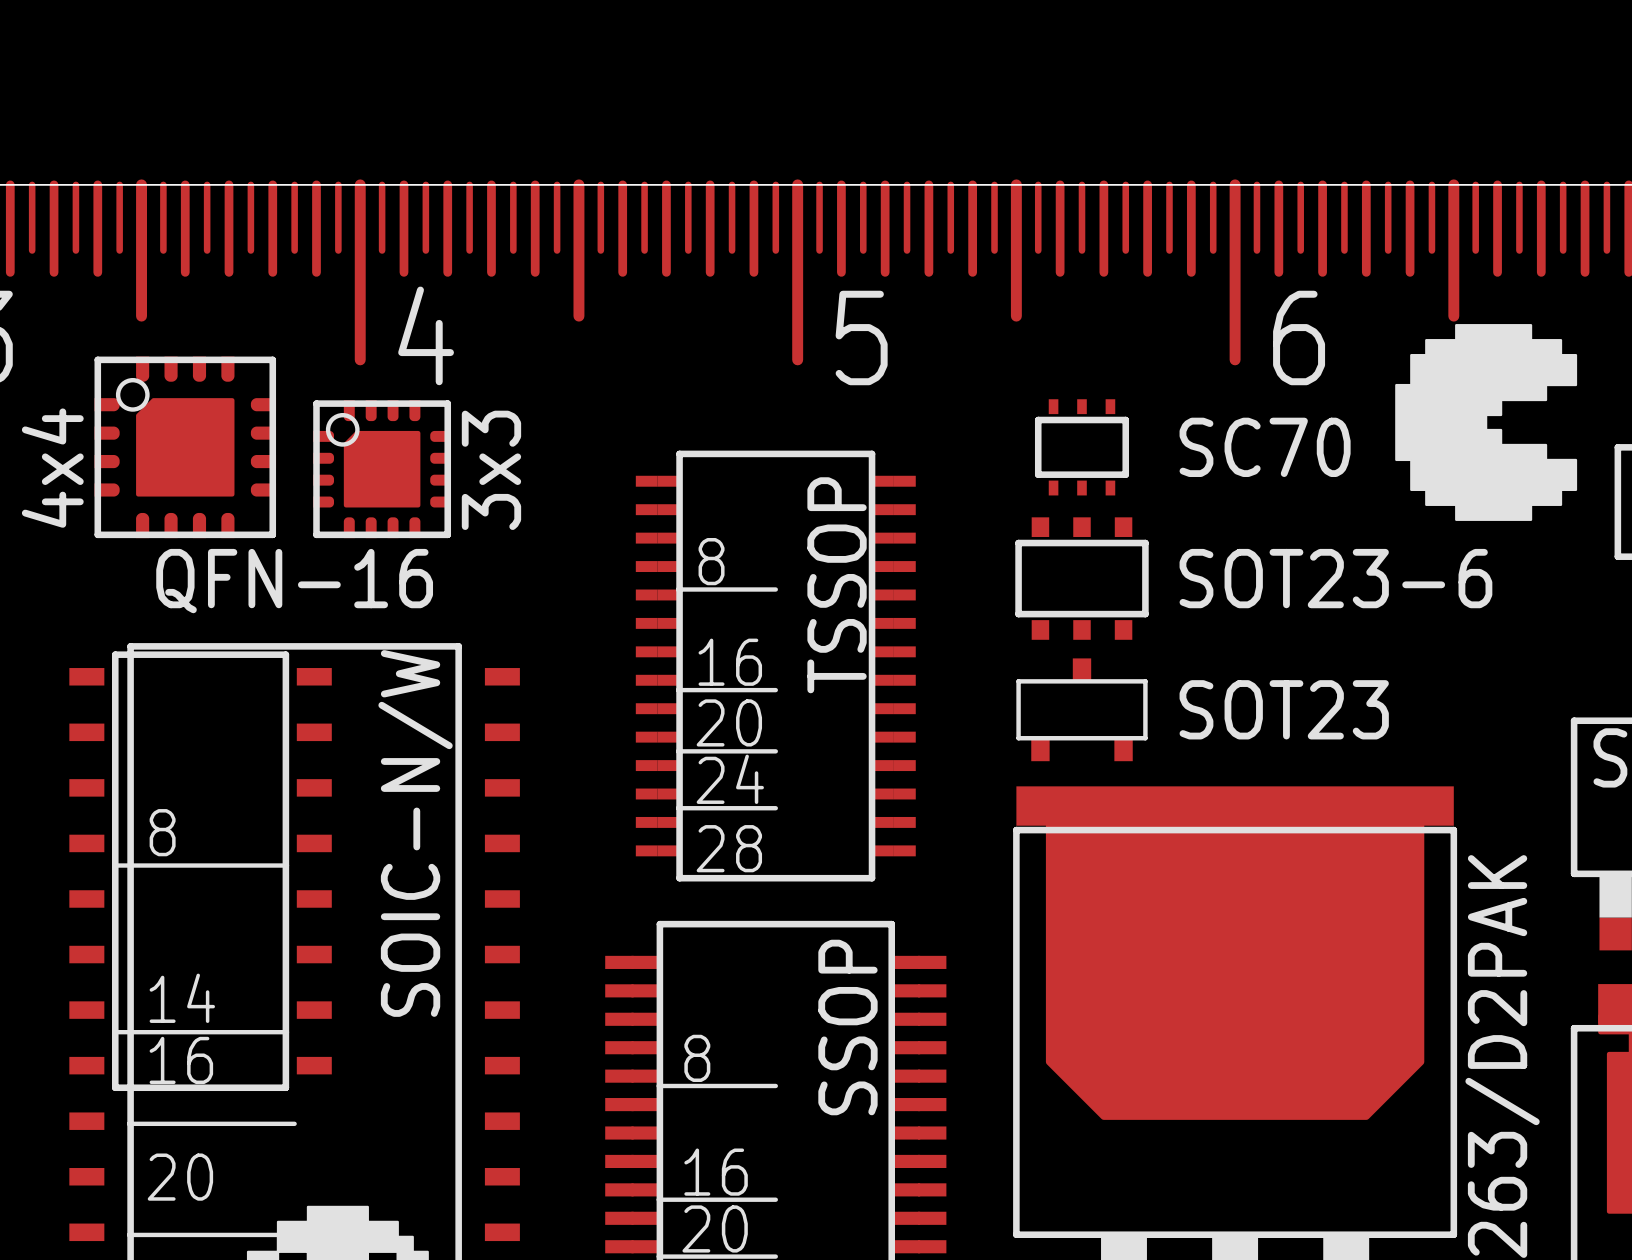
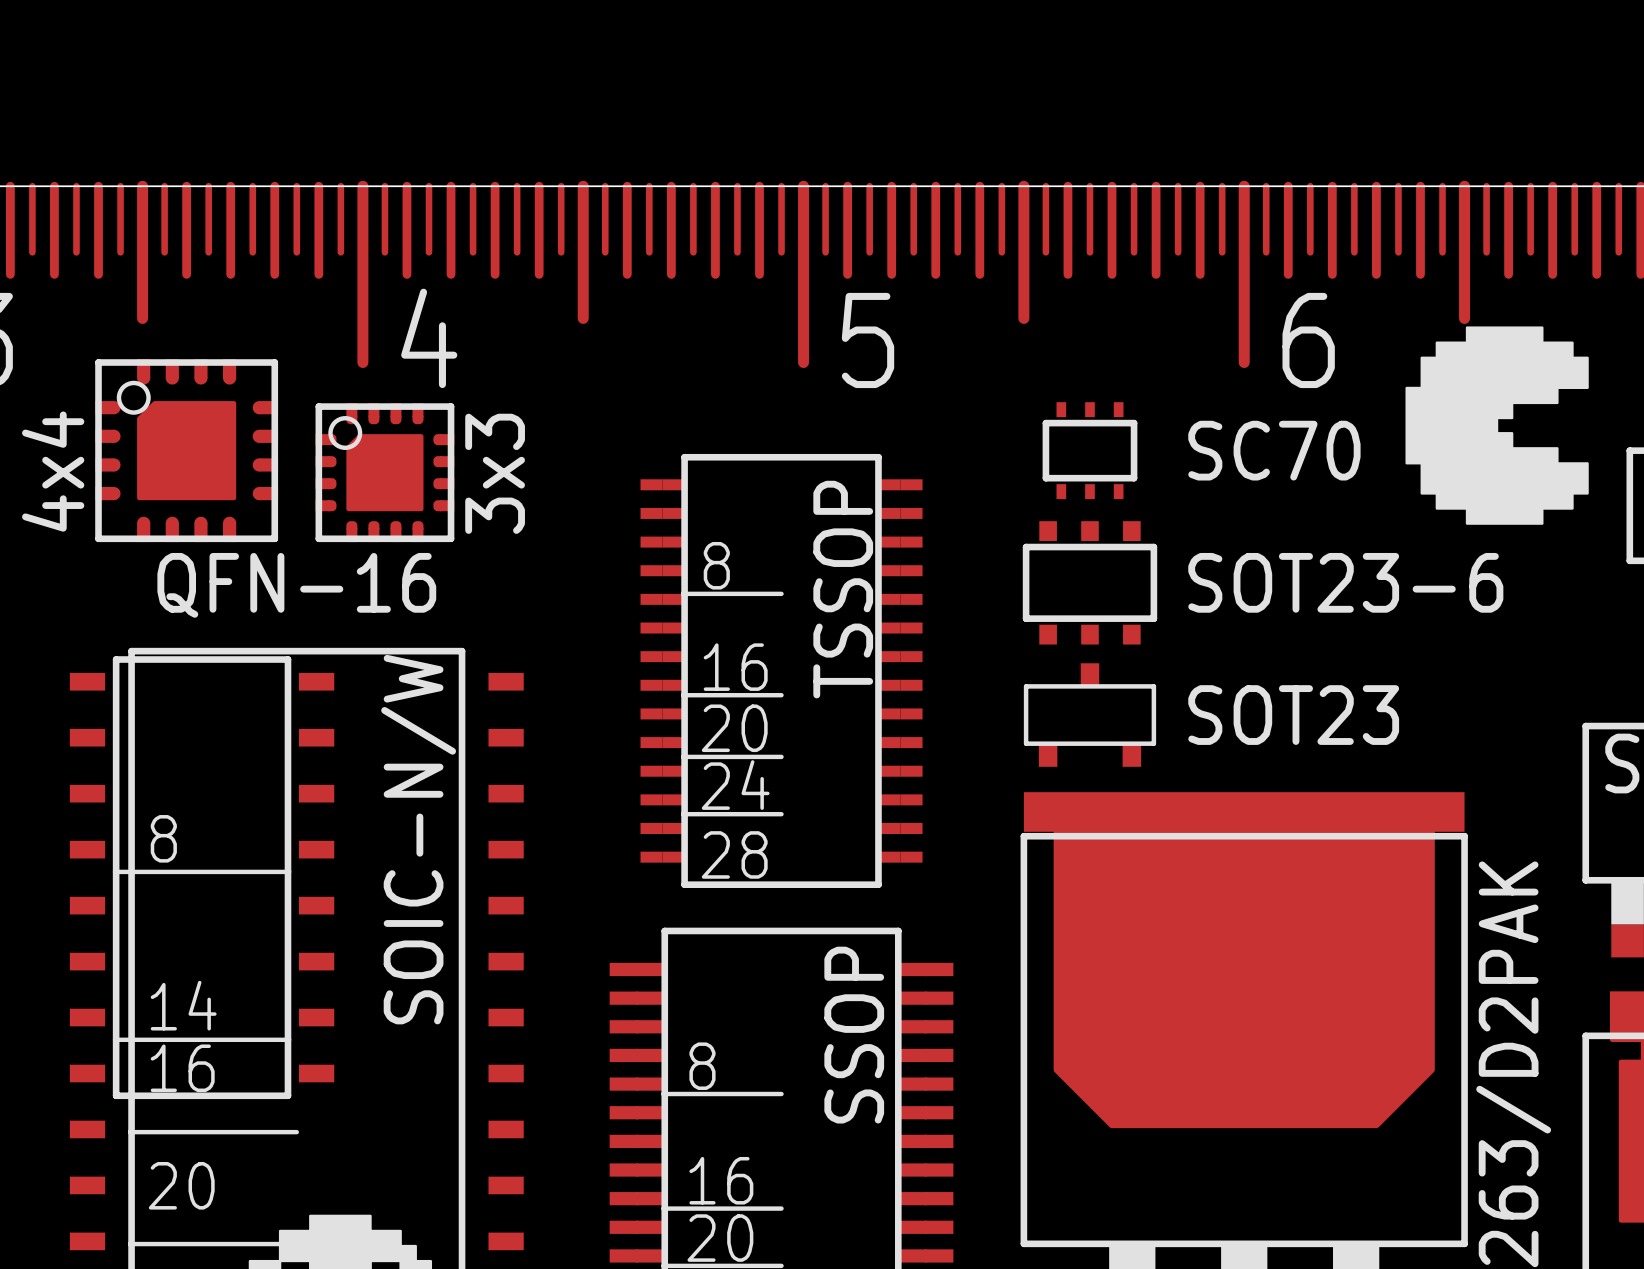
drawing shape: [94, 356, 277, 539] -> [95, 359, 279, 543]
drawing shape: [313, 400, 452, 539] -> [315, 403, 455, 543]

